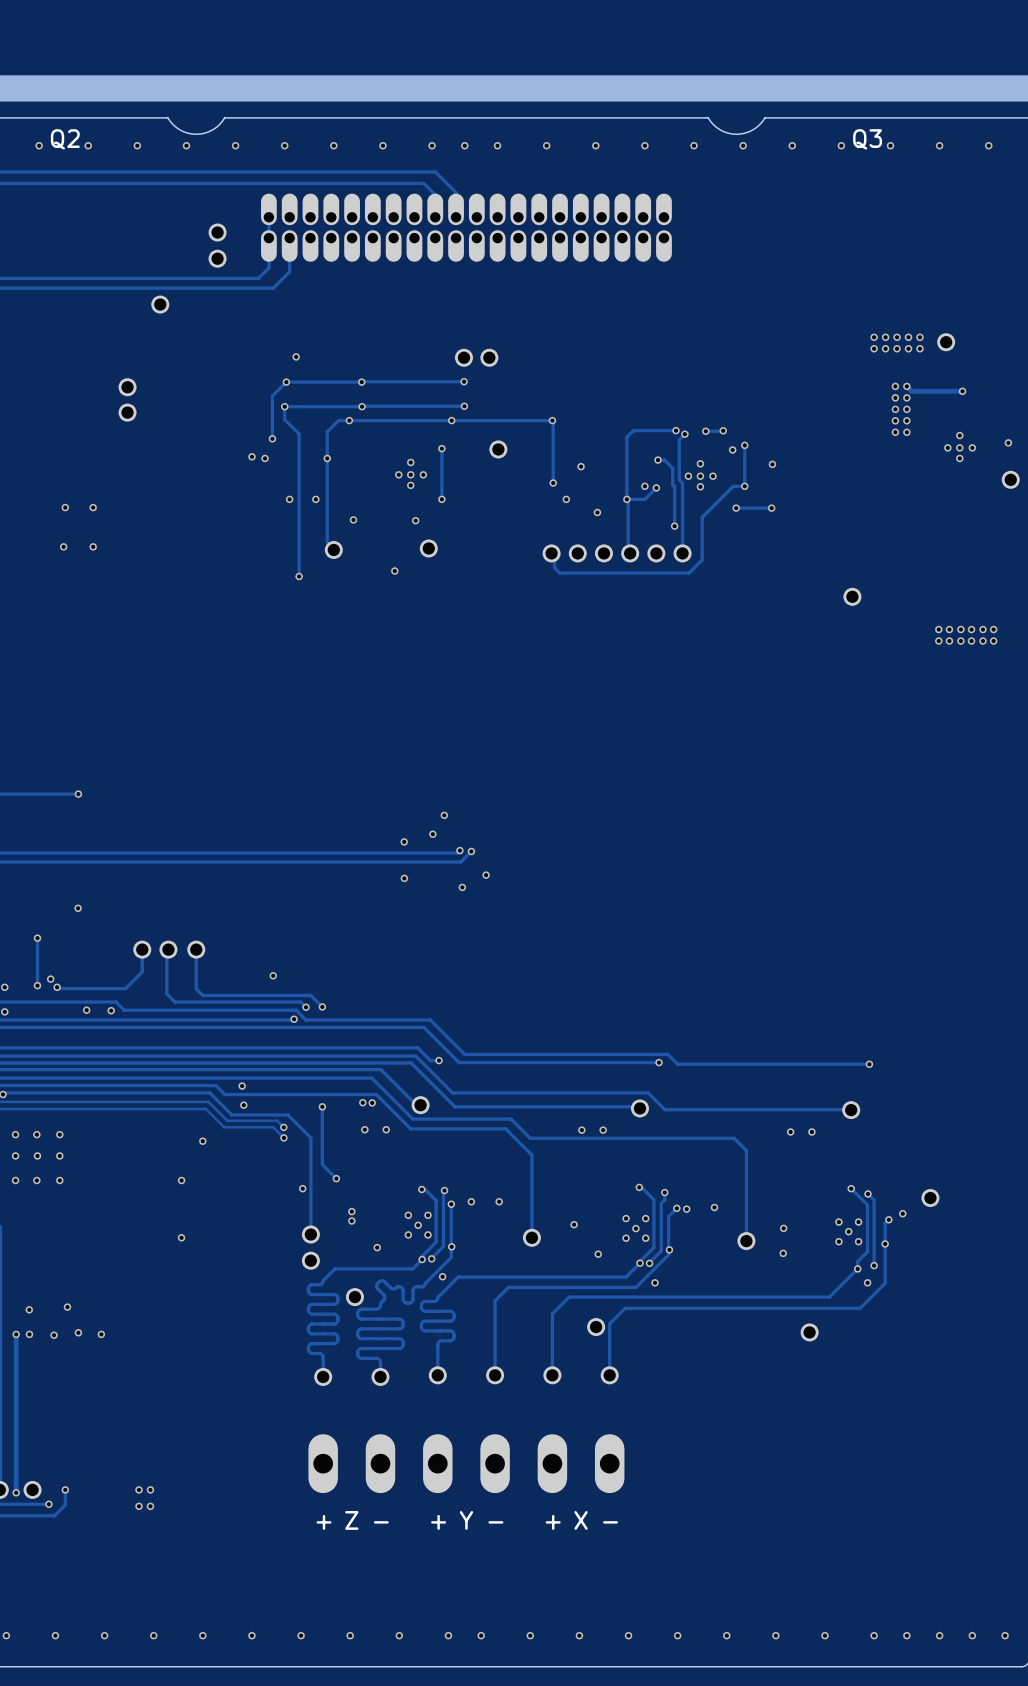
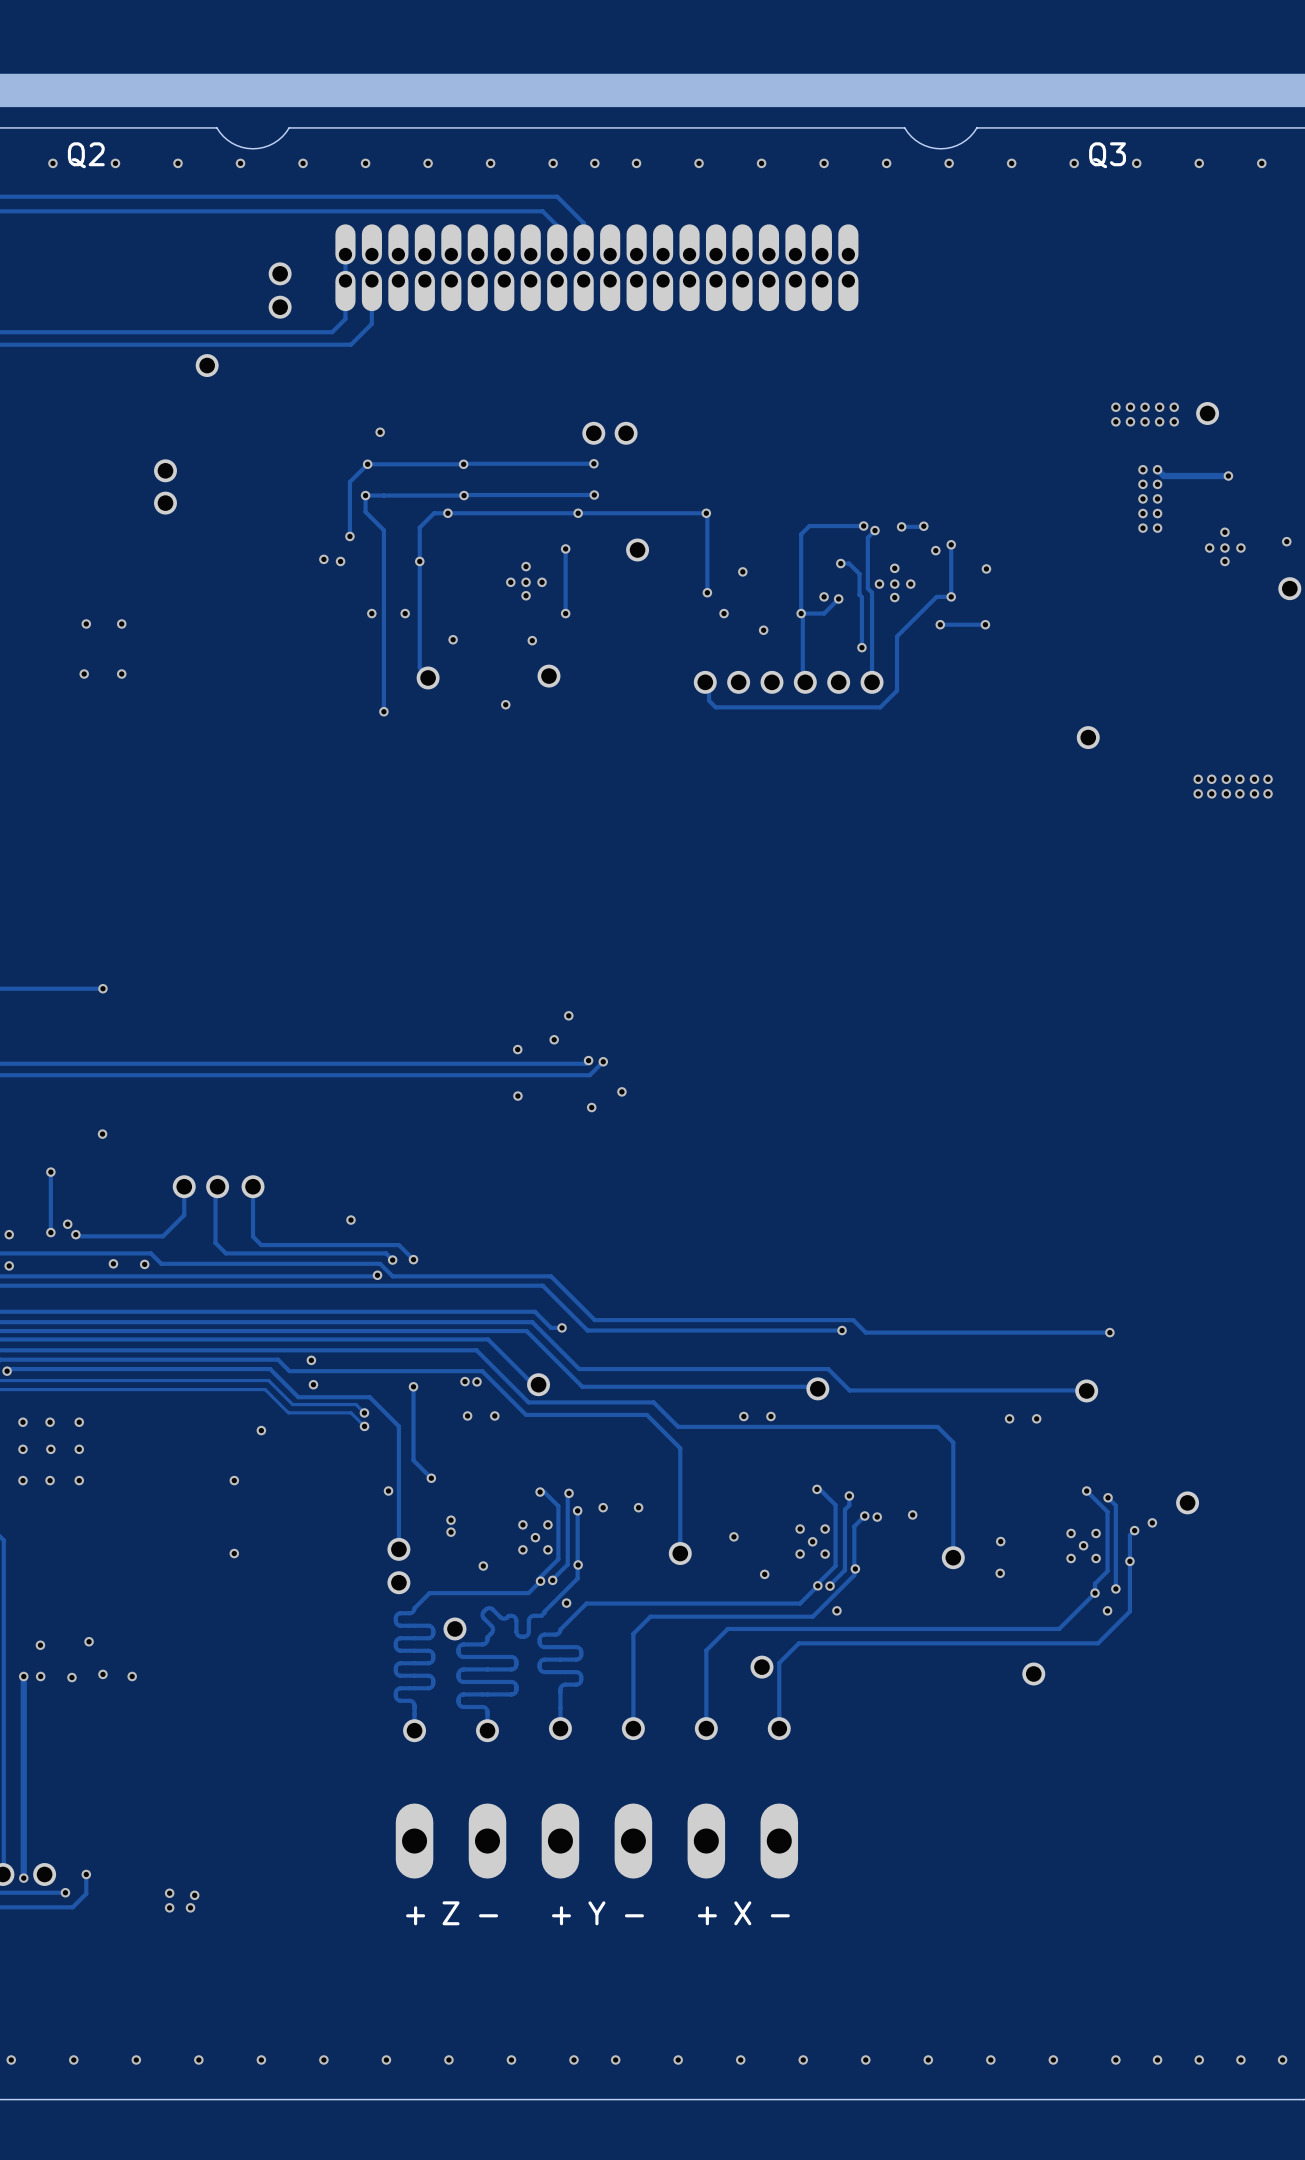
via: (138, 1489) -> none
via: (150, 1489) -> none
via: none -> (169, 1893)
via: (138, 1506) -> none
via: none -> (169, 1907)
via: none -> (190, 1907)

